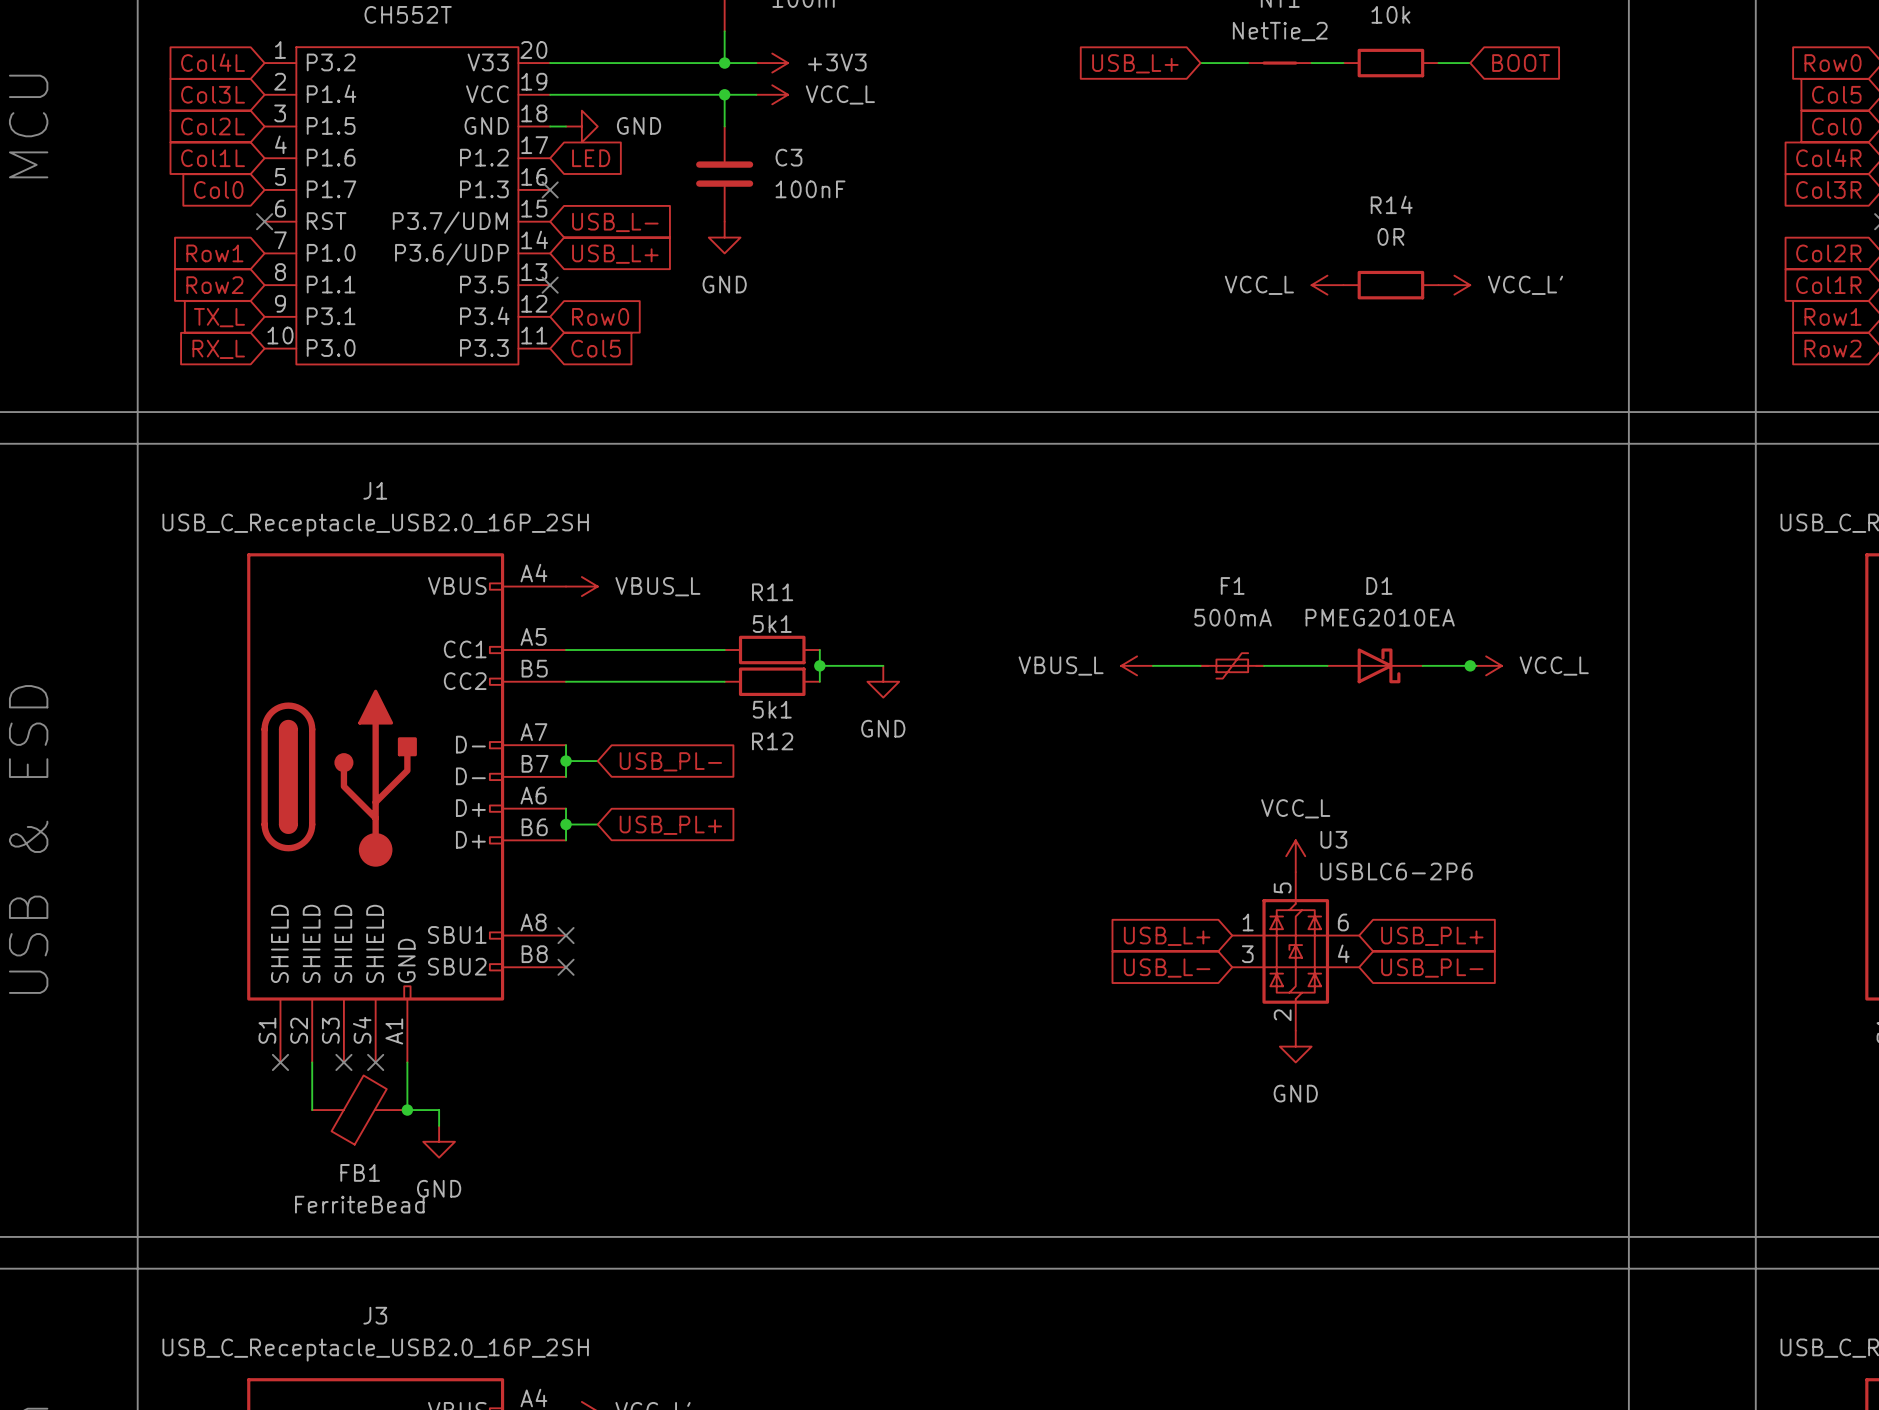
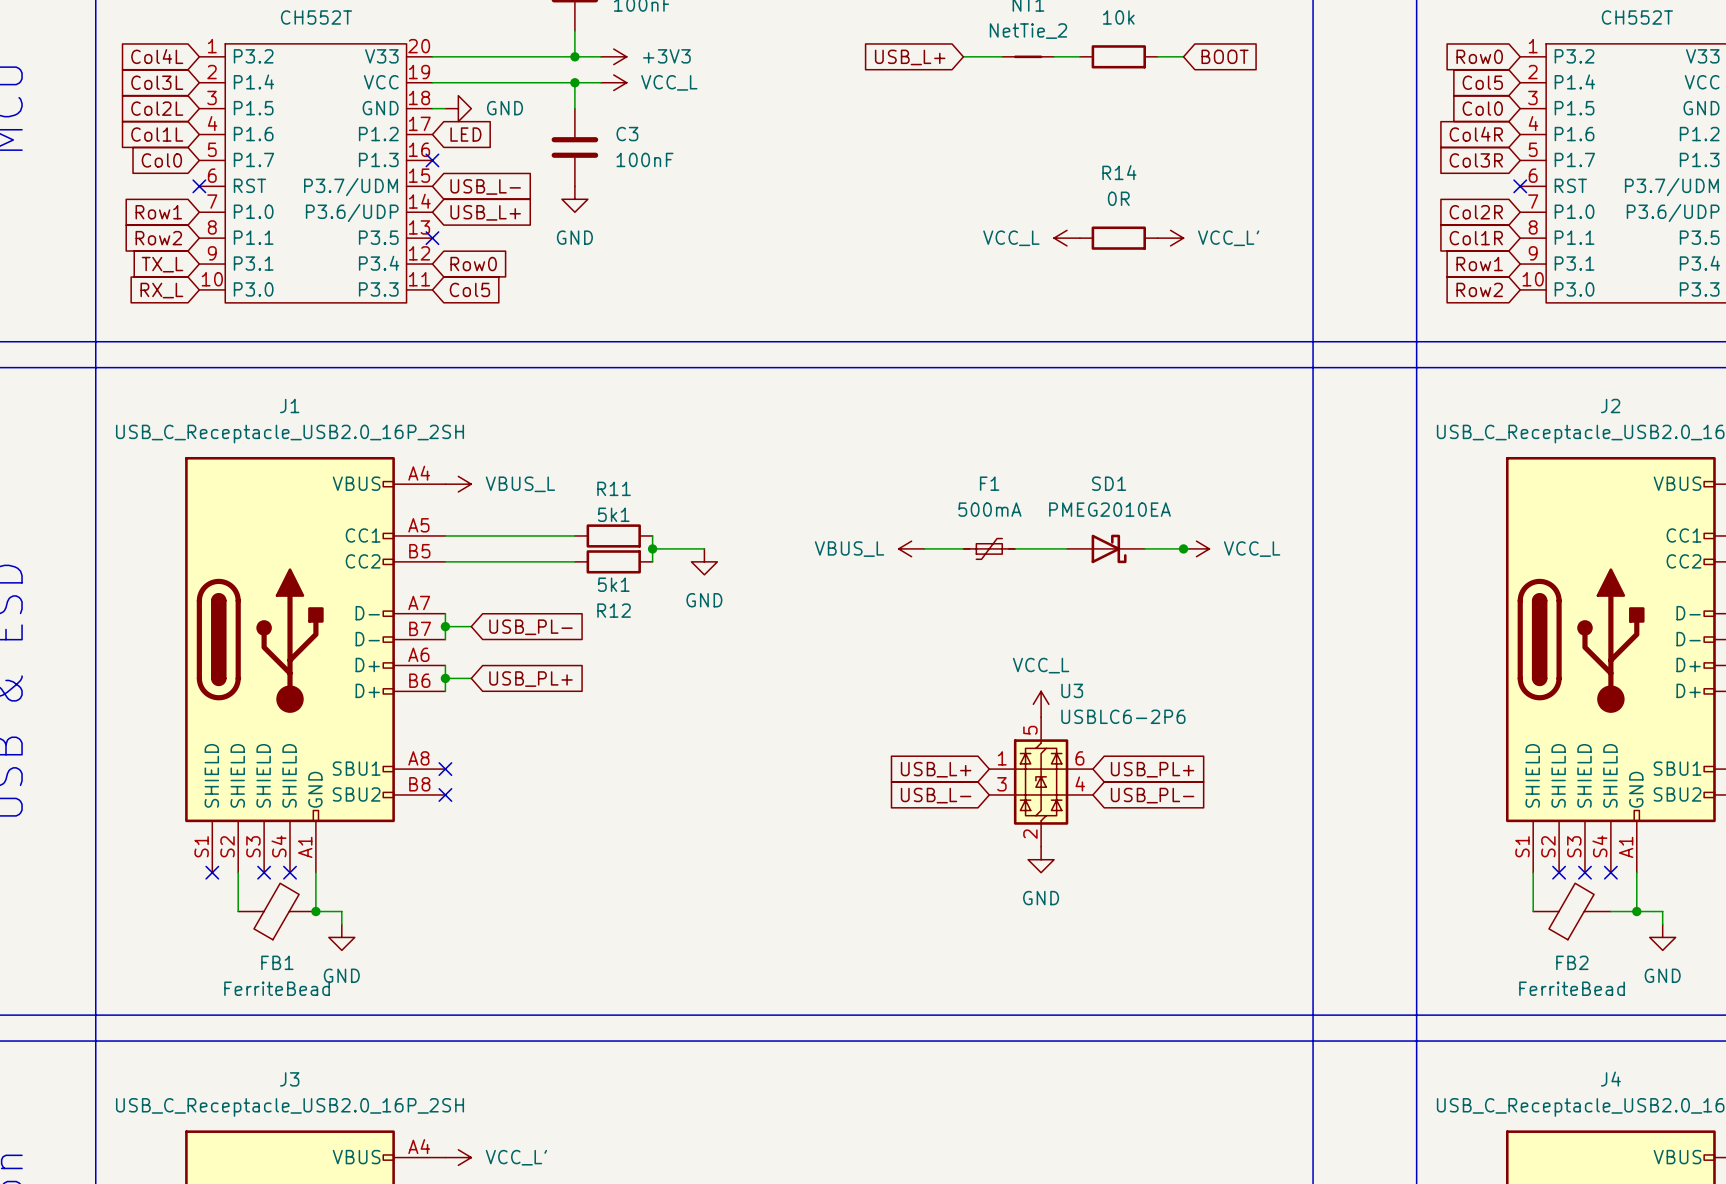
D1 name: D1 (1379, 585) -> SD1 (1109, 483)

